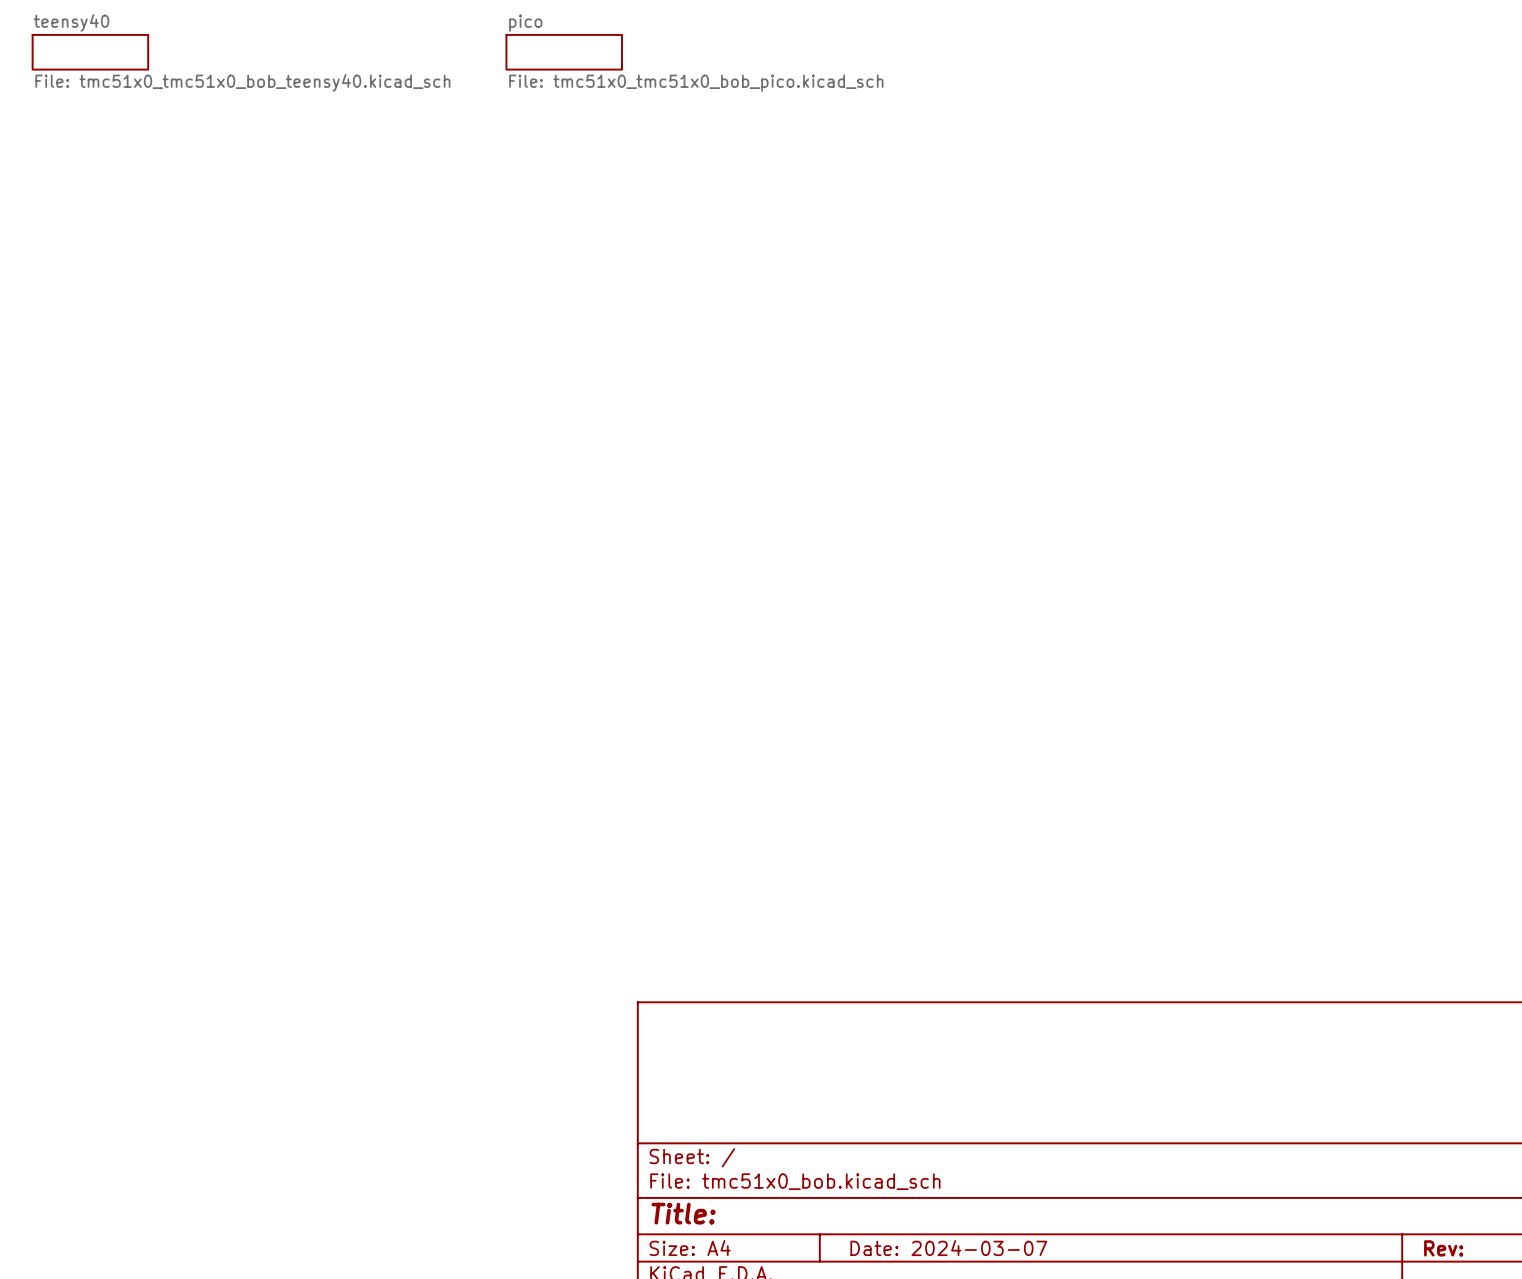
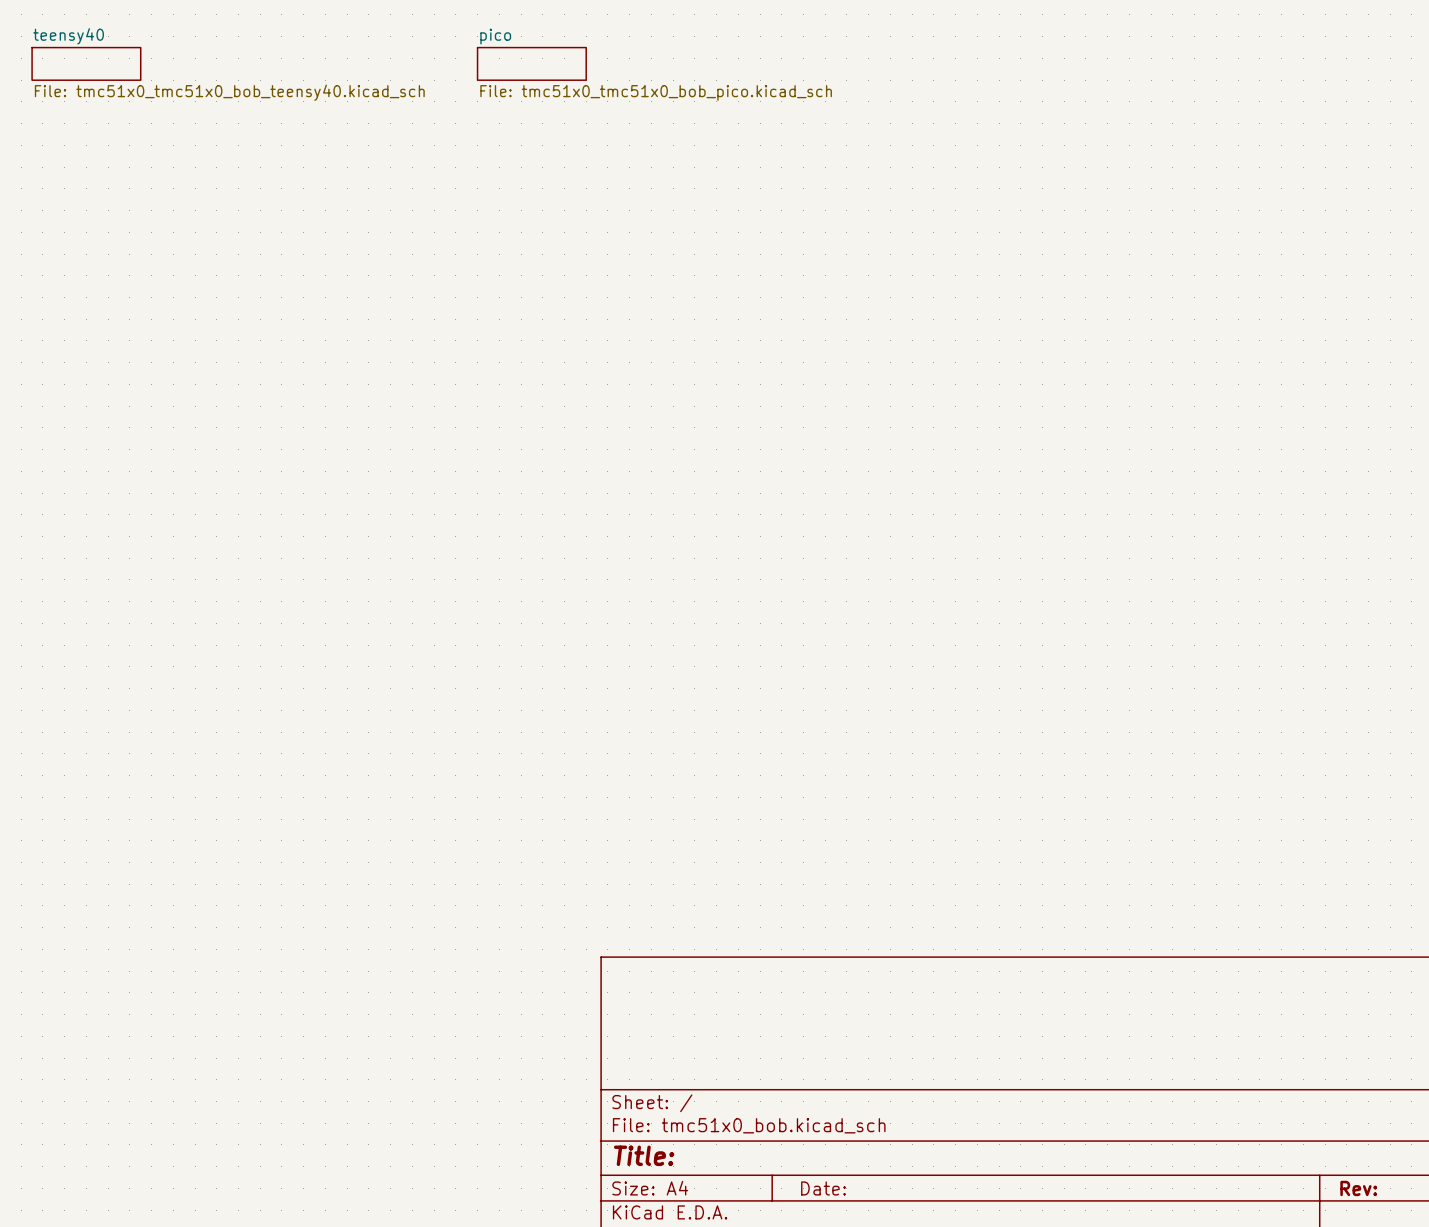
title block: Date: 2024-03-07 (948, 1248) -> Date: (823, 1188)

